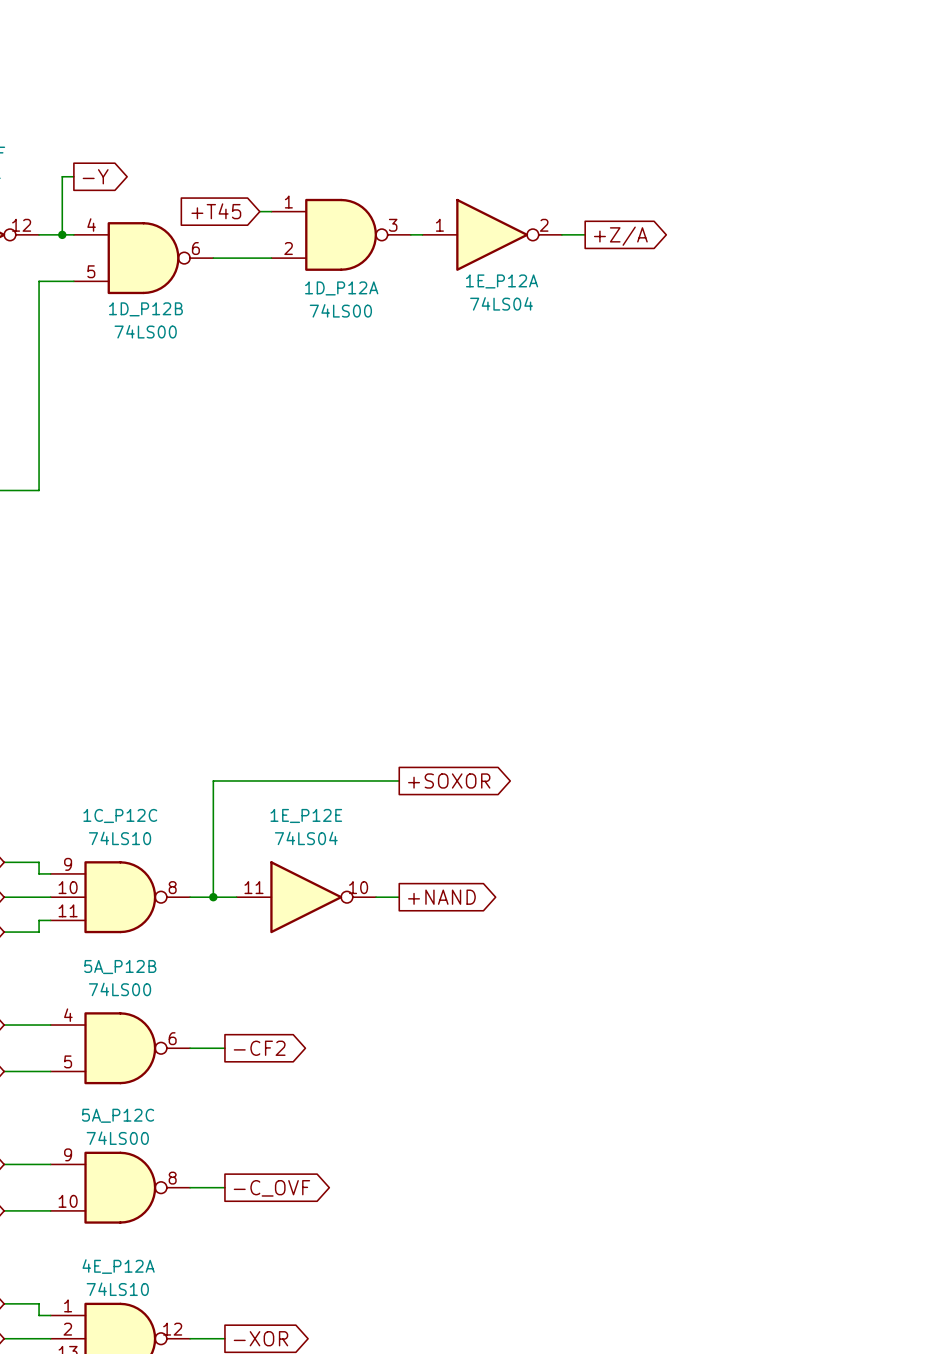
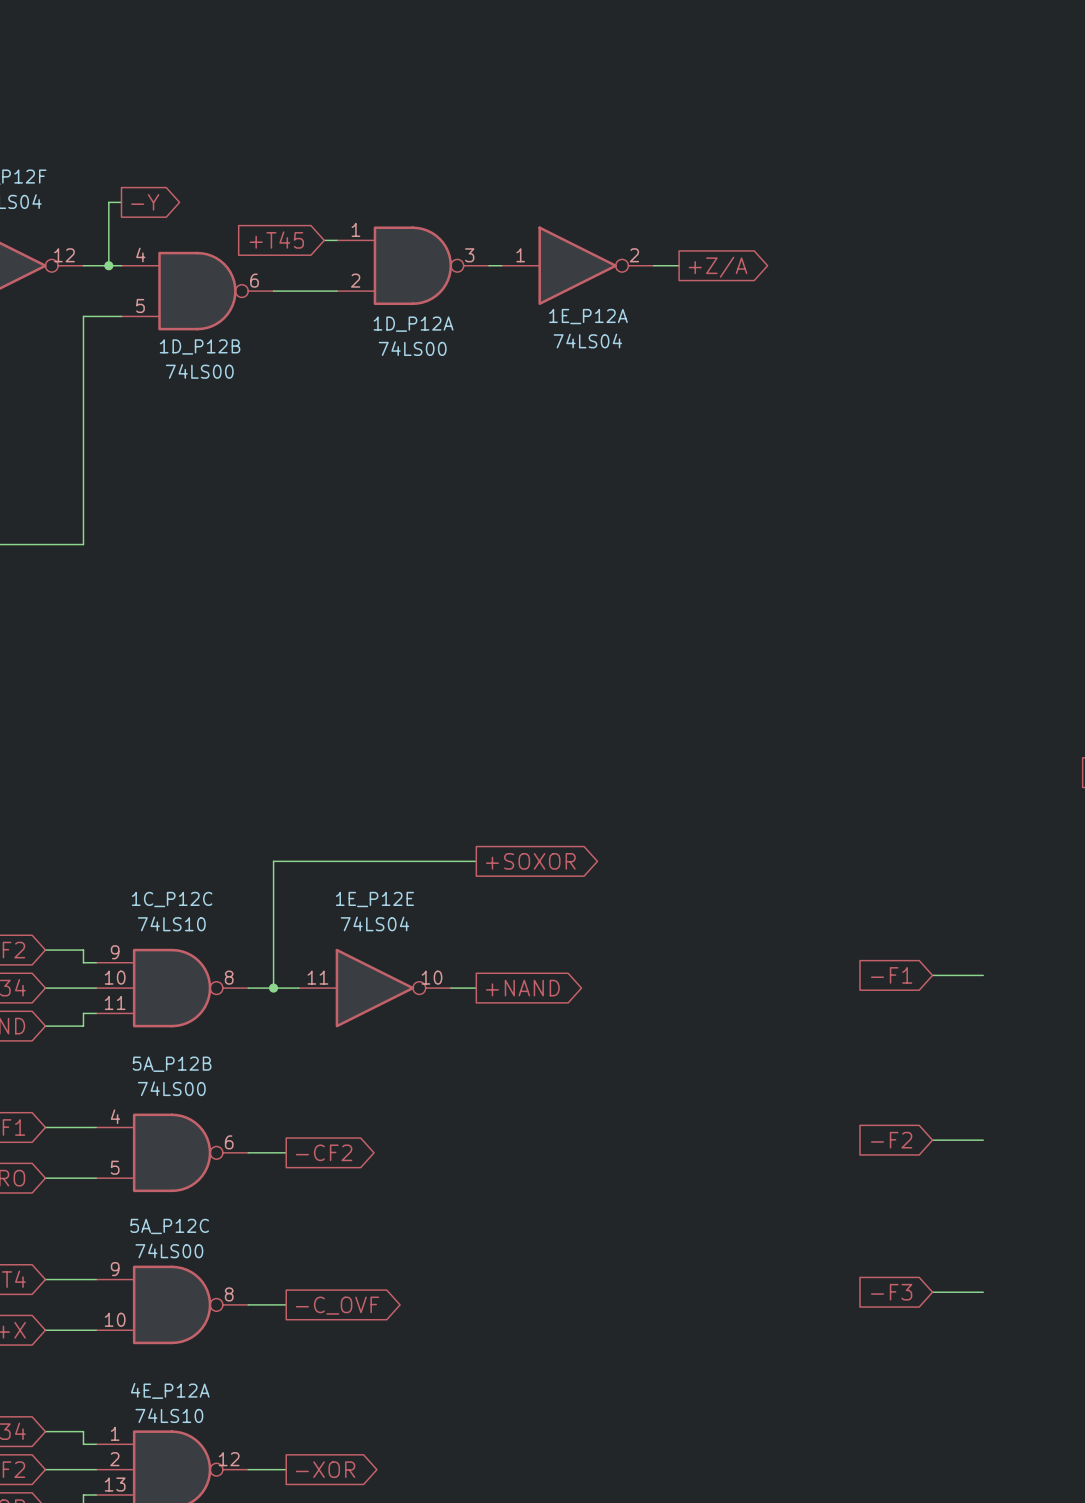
global label: none -> -F1 (891, 975)
wire: none -> (932, 975) (983, 975)
global label: none -> -F2 (891, 1140)
wire: none -> (932, 1140) (983, 1140)
global label: none -> -F3 (891, 1292)
wire: none -> (932, 1292) (983, 1292)

